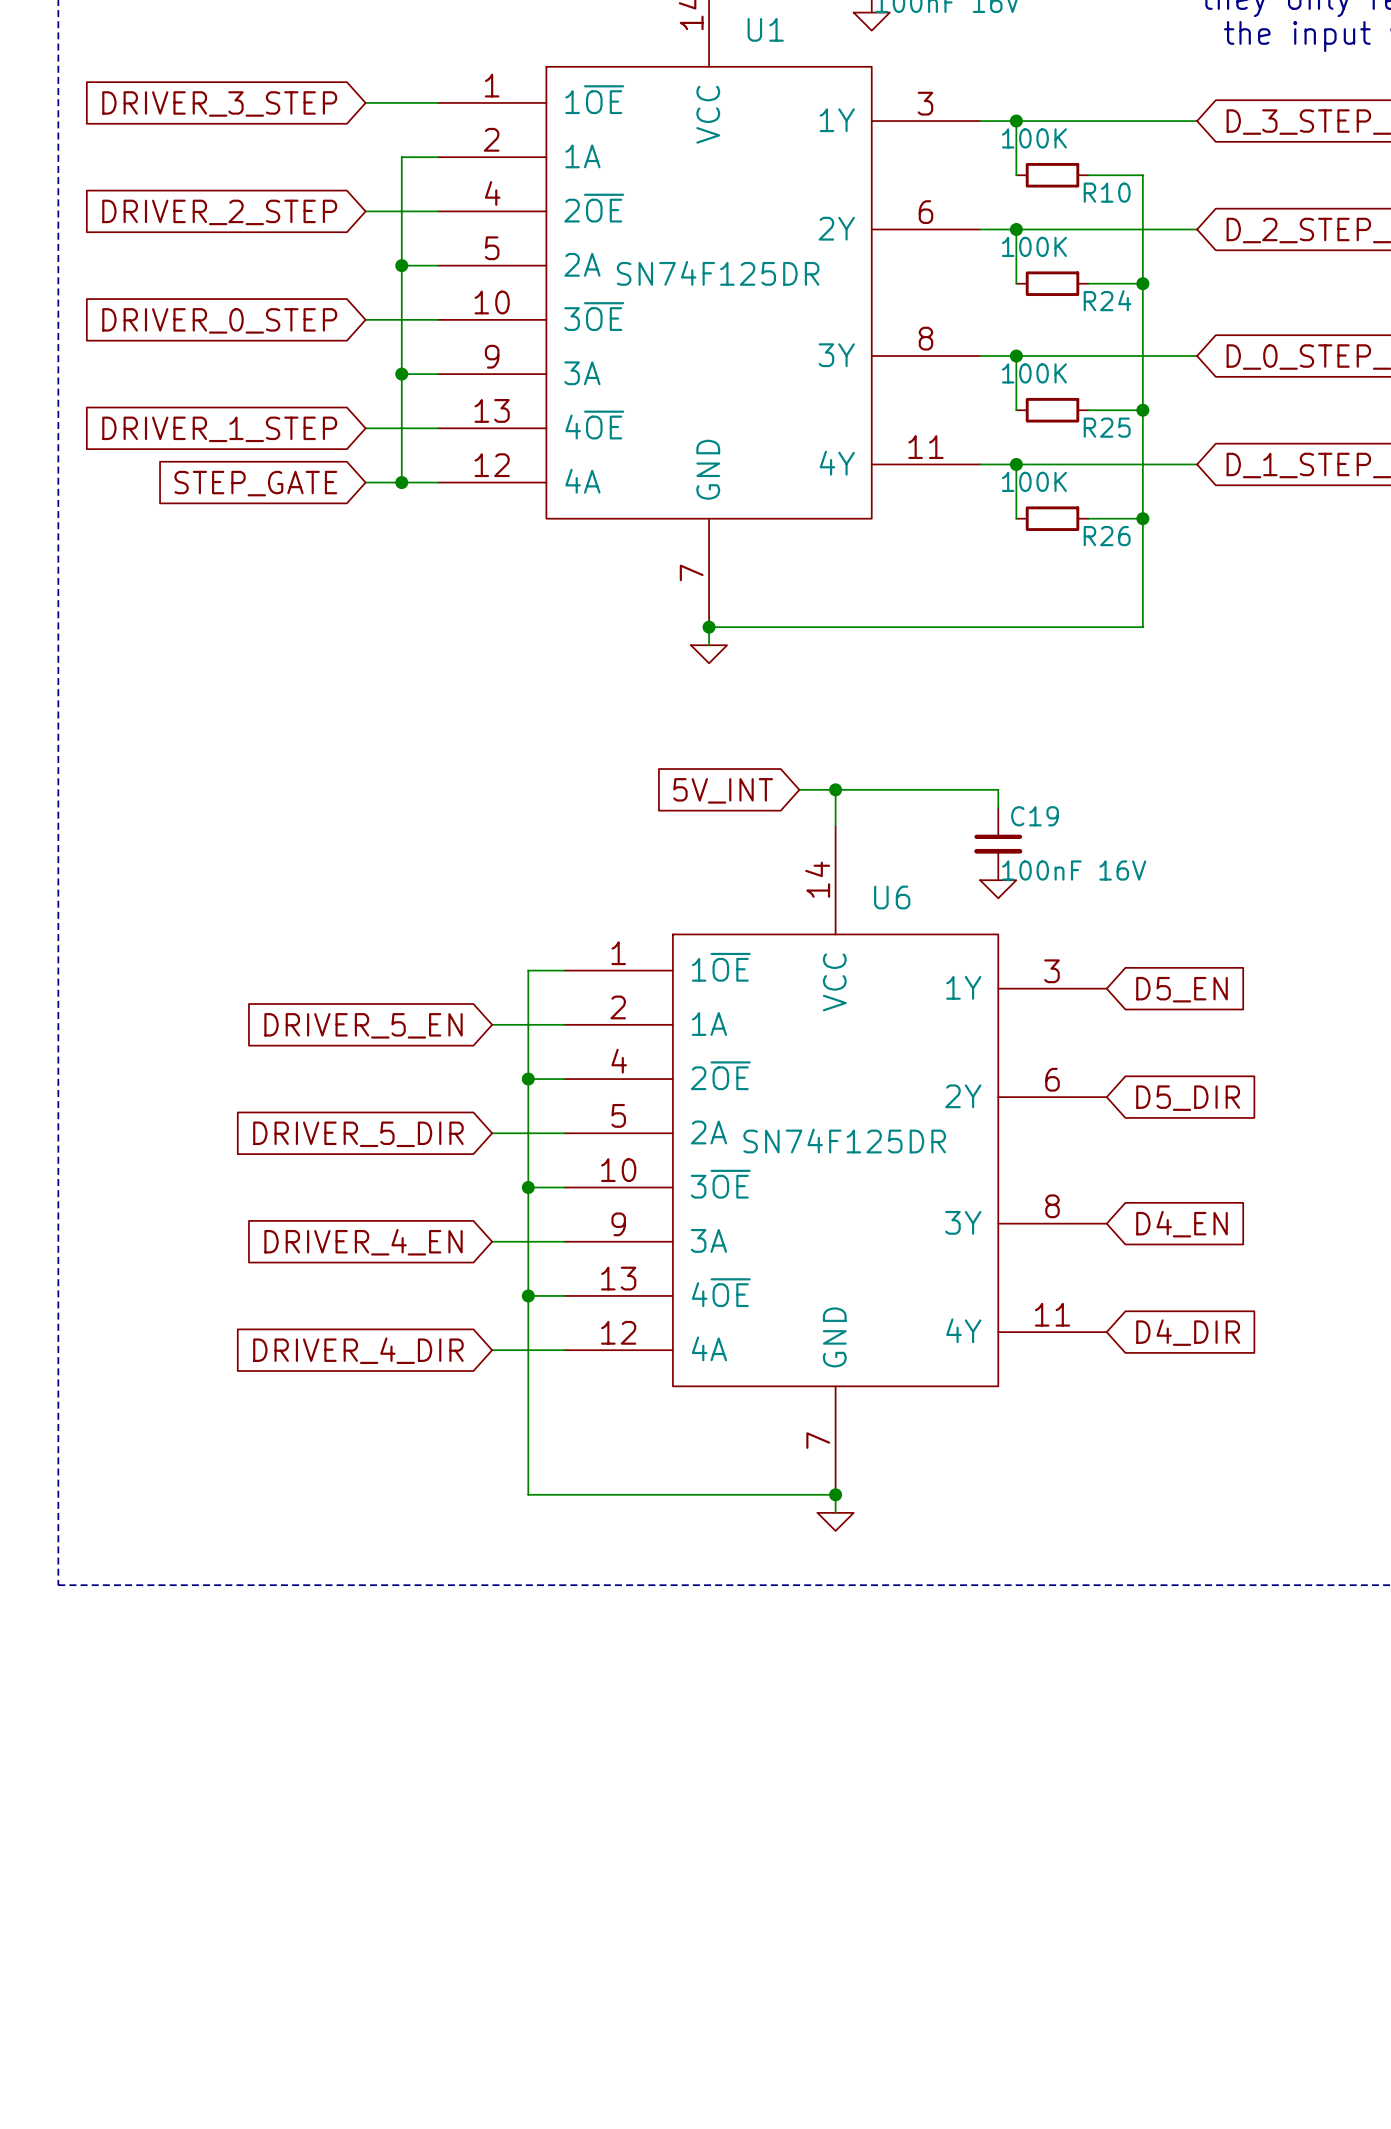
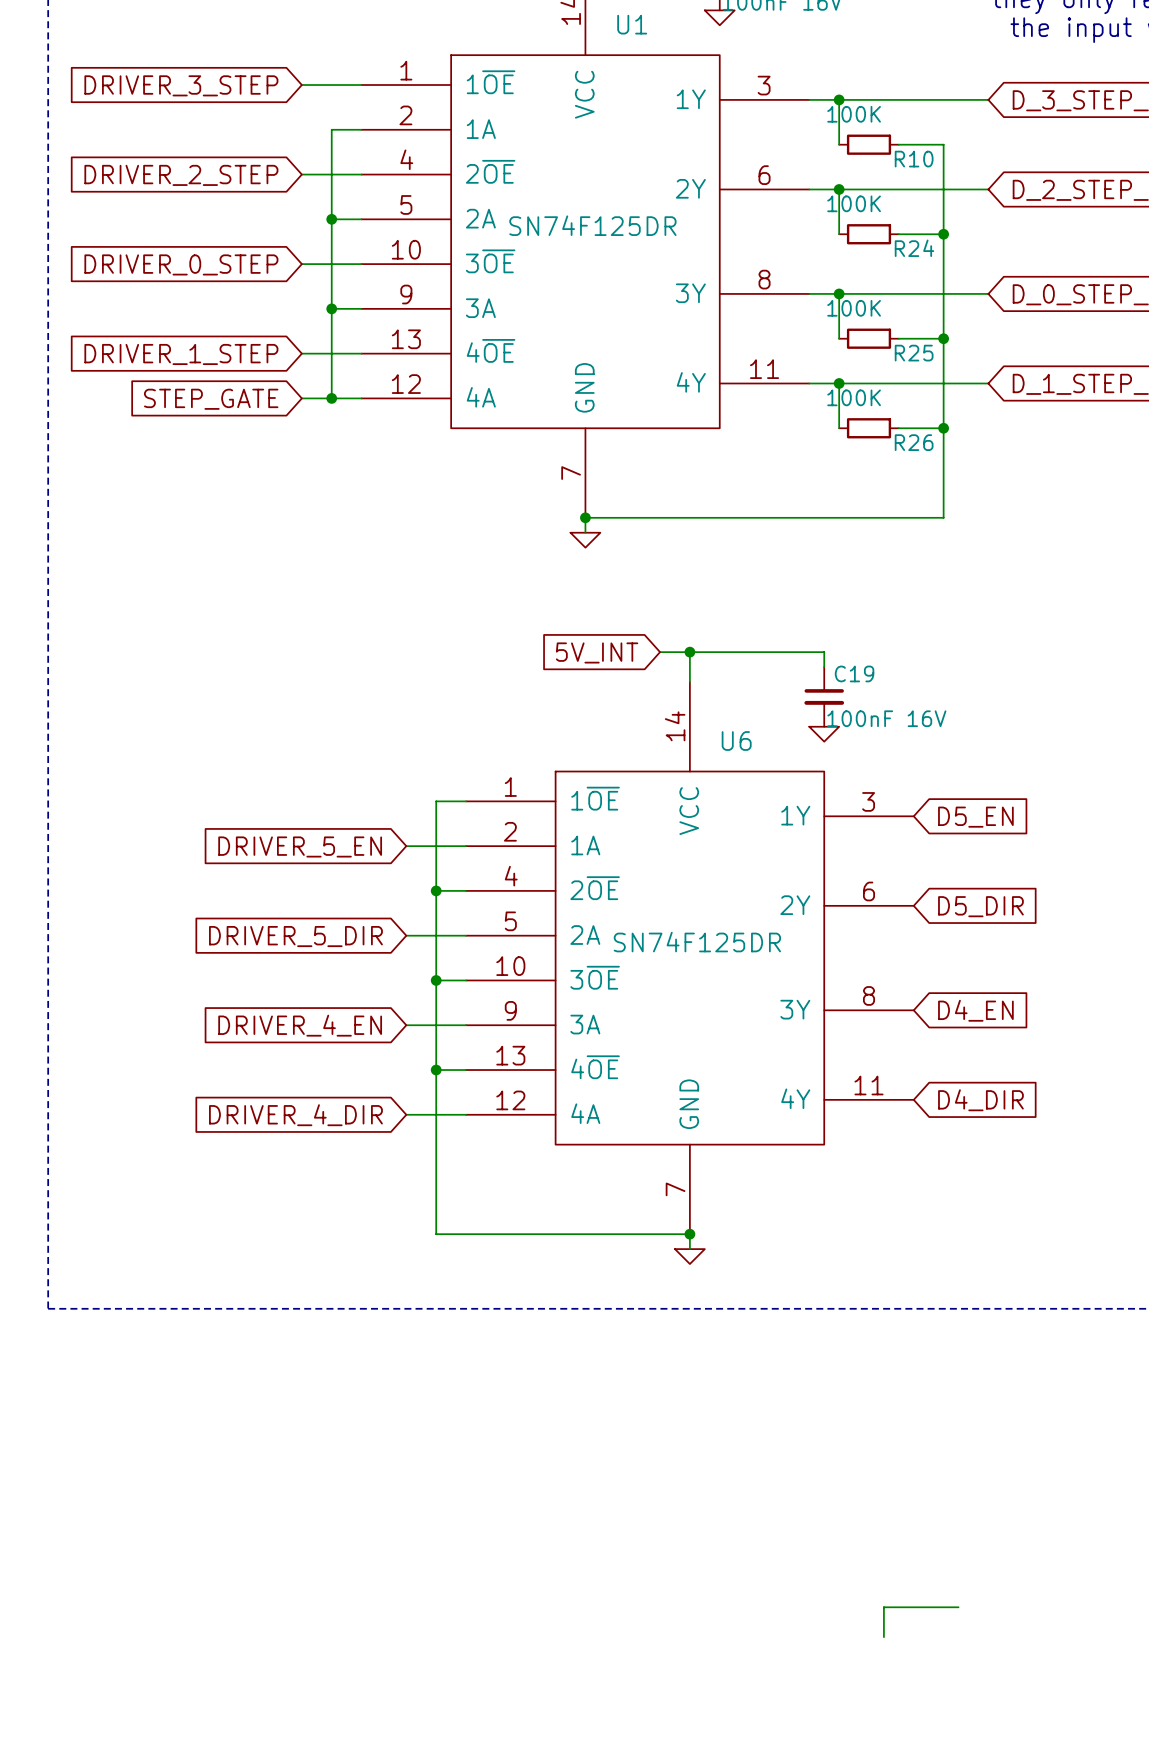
wire: none -> (958, 1607) (883, 1607) (883, 1637)

